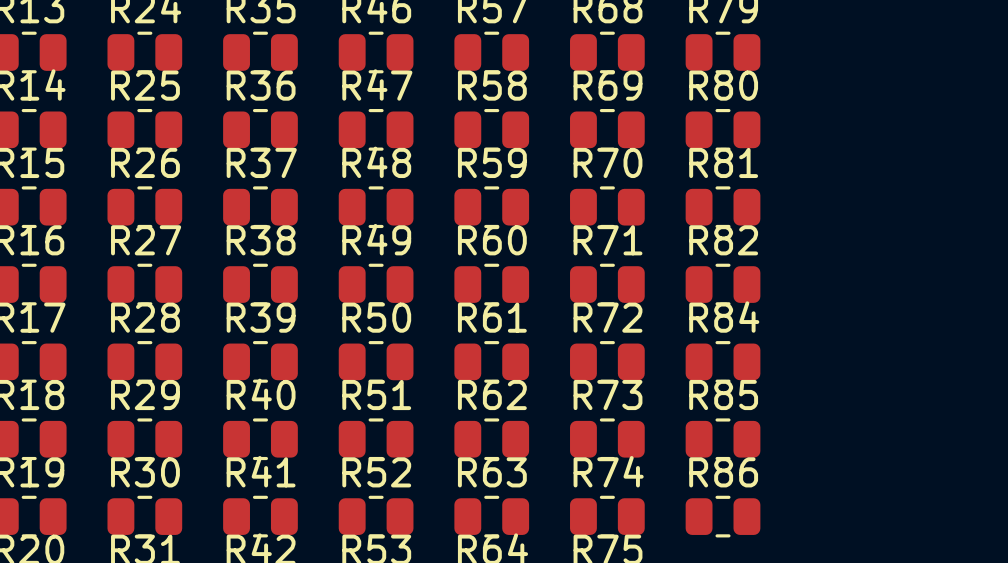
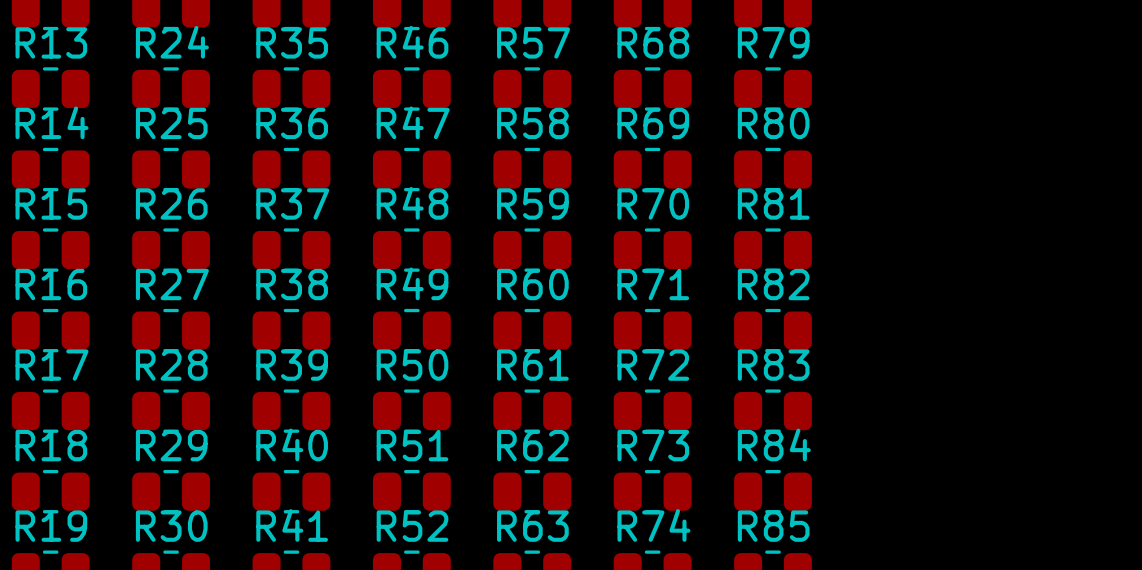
R84 name: R84 (724, 317) -> R83 (773, 365)
R85 name: R85 (723, 395) -> R84 (774, 444)
R86 name: R86 (723, 472) -> R85 (773, 526)

